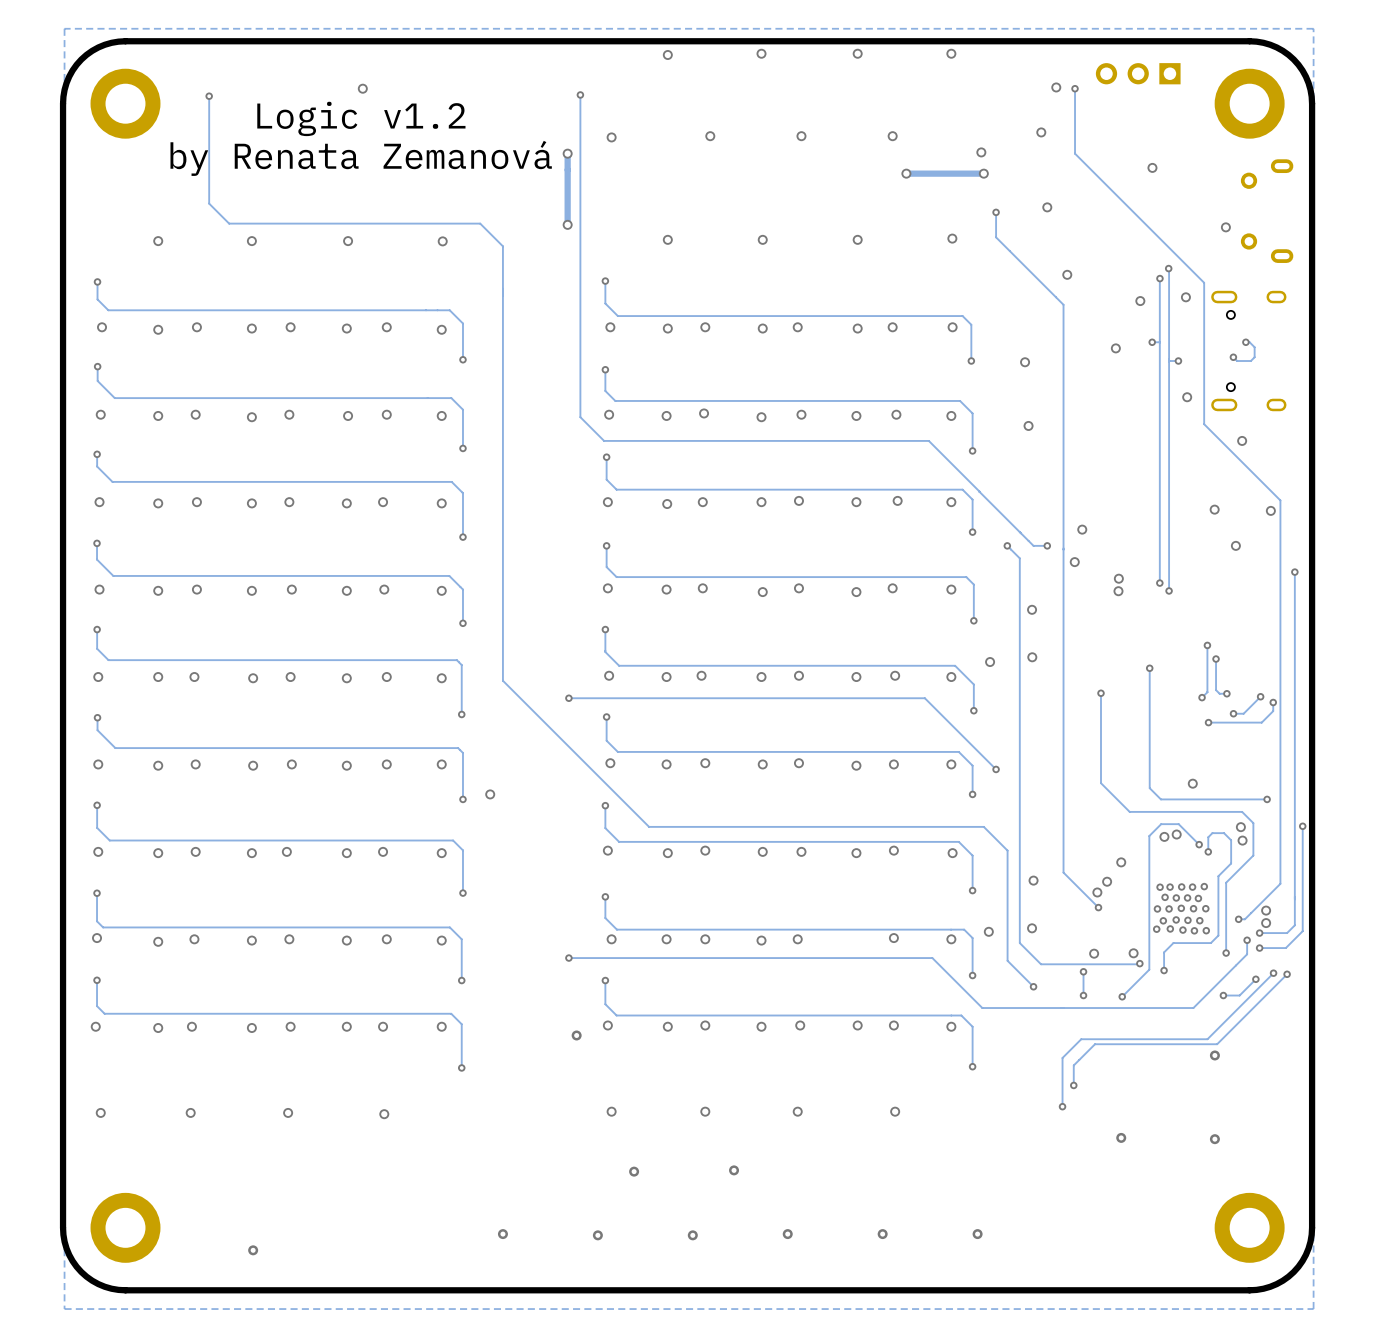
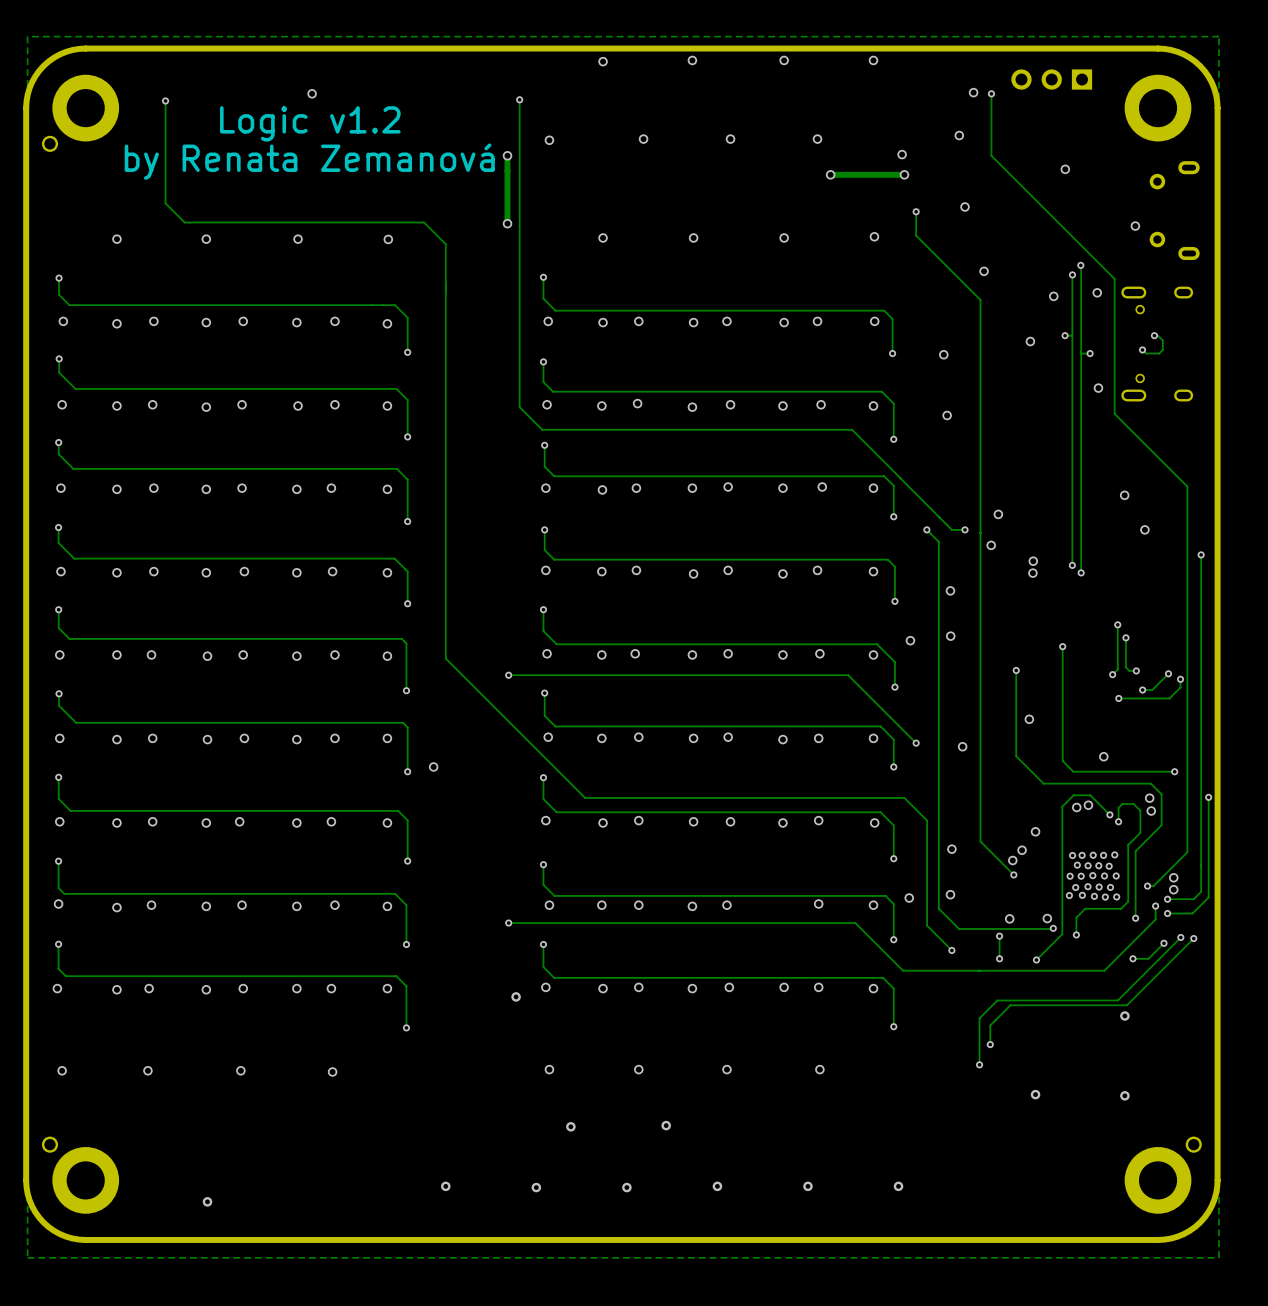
round board edge: none -> [41, 135, 59, 152]
via: (1242, 440) -> none
via: (1270, 510) -> none
via: none -> (1029, 719)
via: none -> (962, 746)
round board edge: none -> [41, 1136, 59, 1153]
round board edge: none -> [1185, 1136, 1202, 1153]

